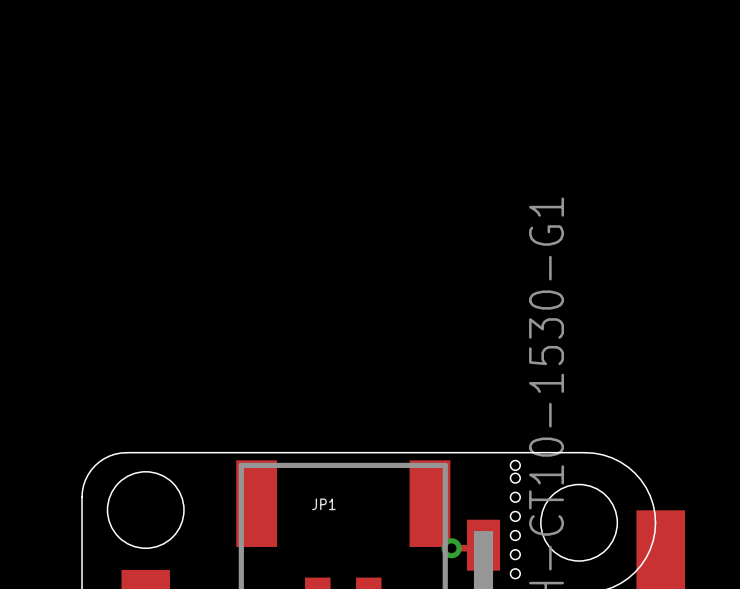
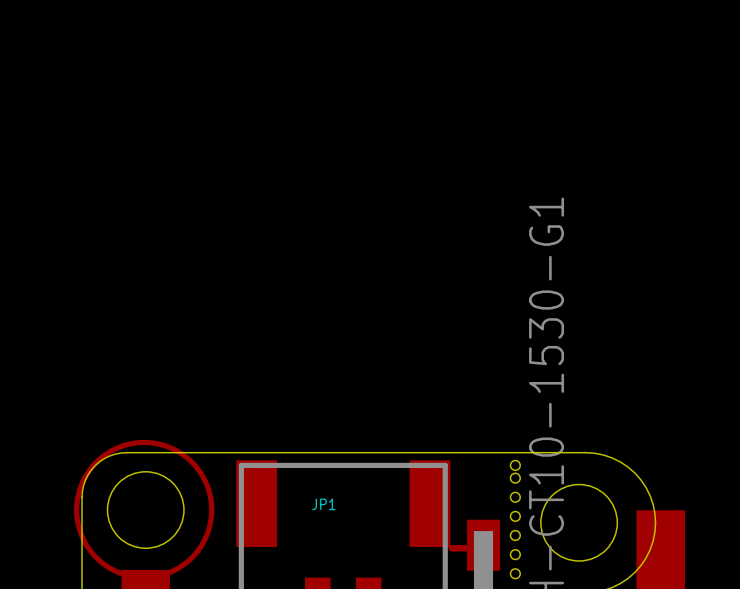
drawing: none -> [74, 439, 215, 581]
via: (451, 548) -> none

